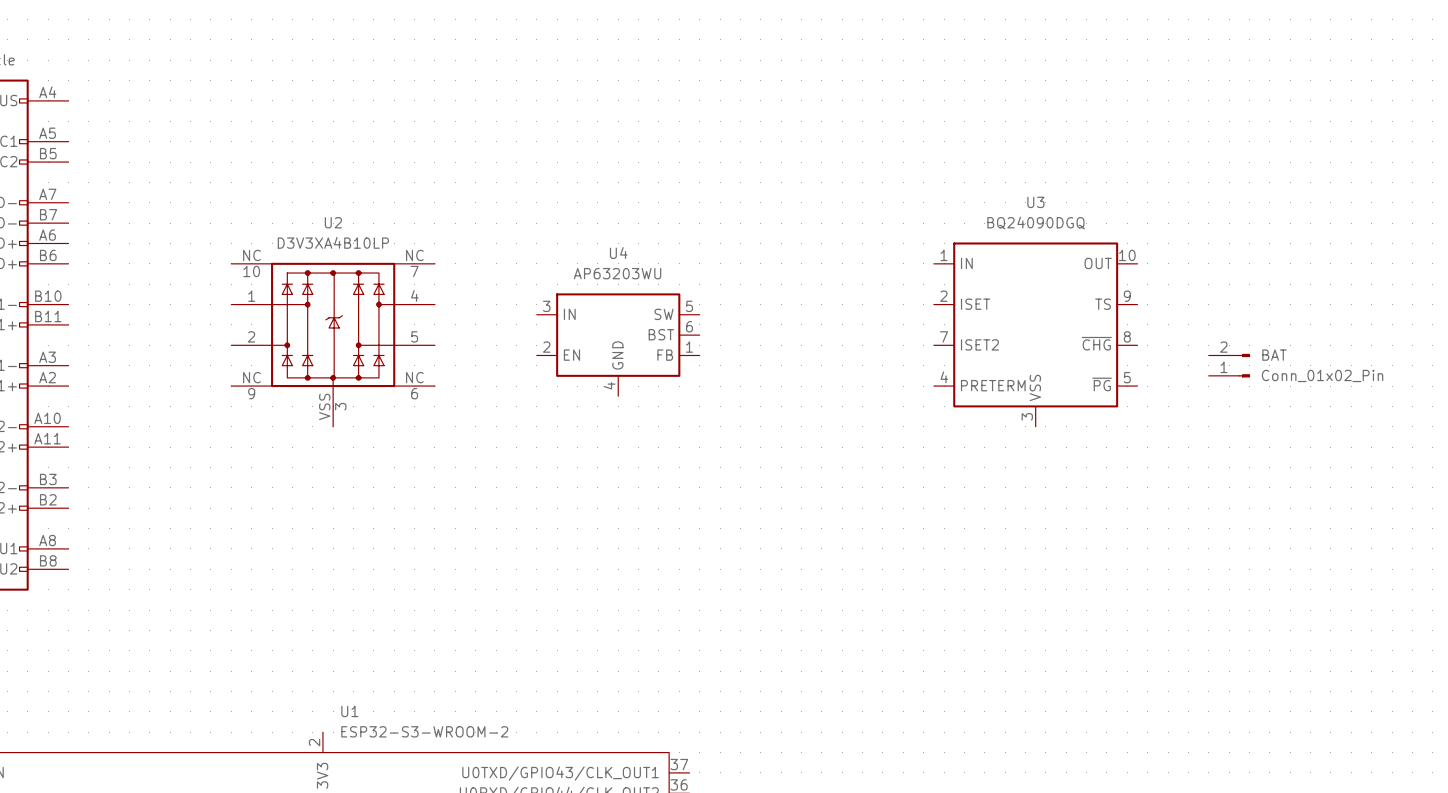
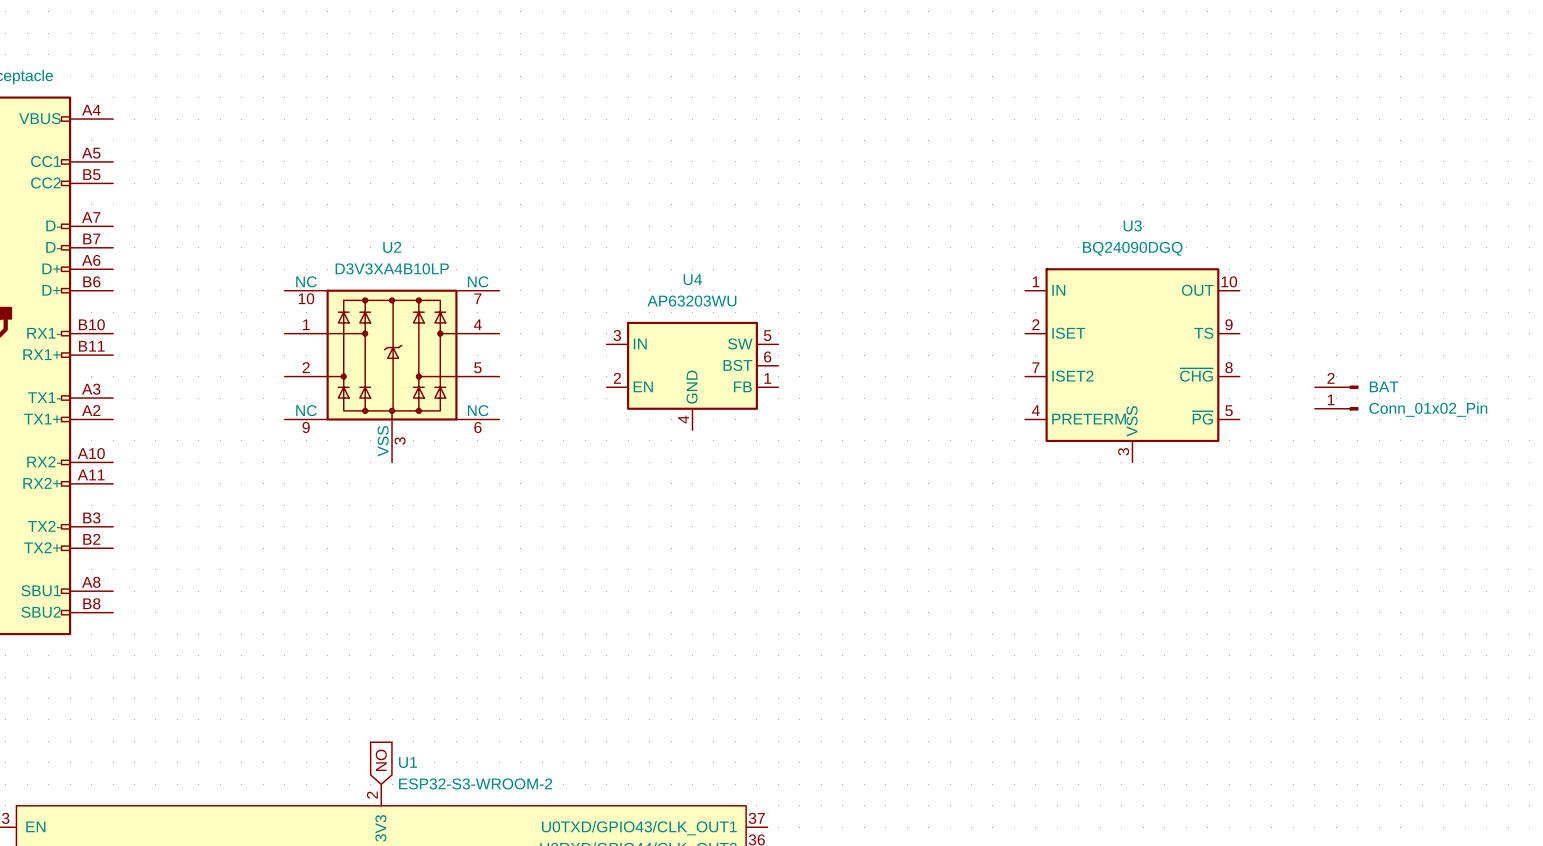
global label: none -> NO (381, 760)

